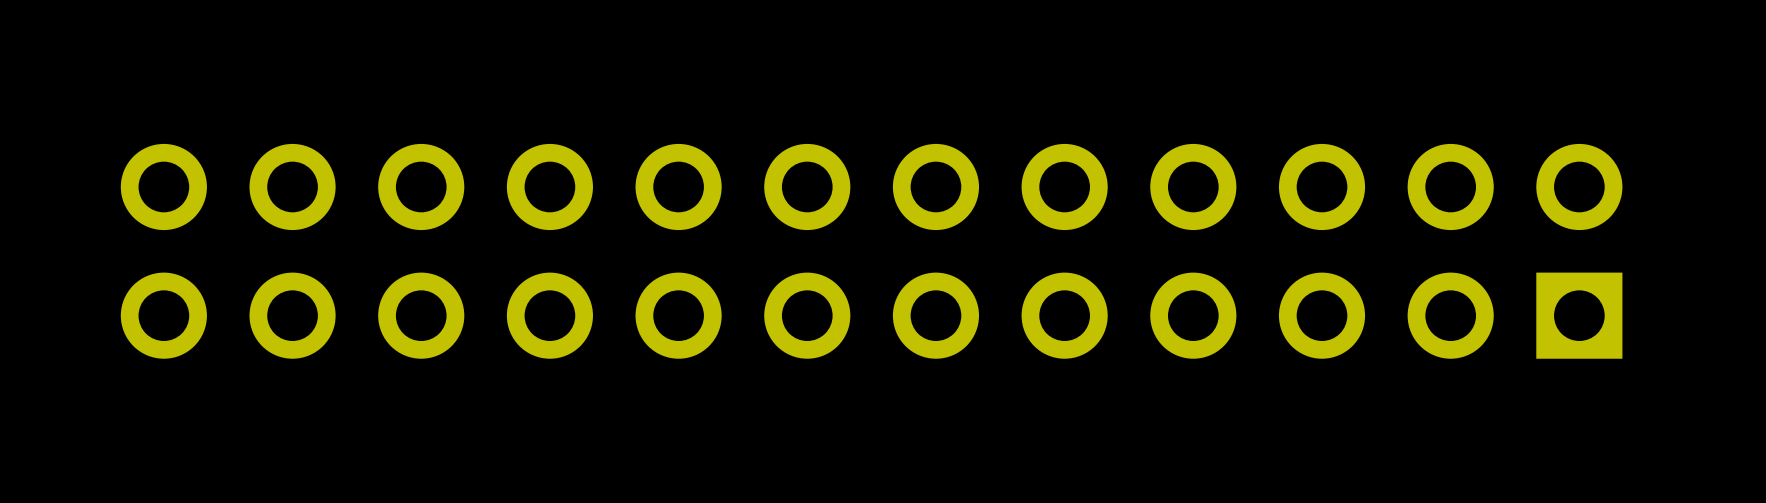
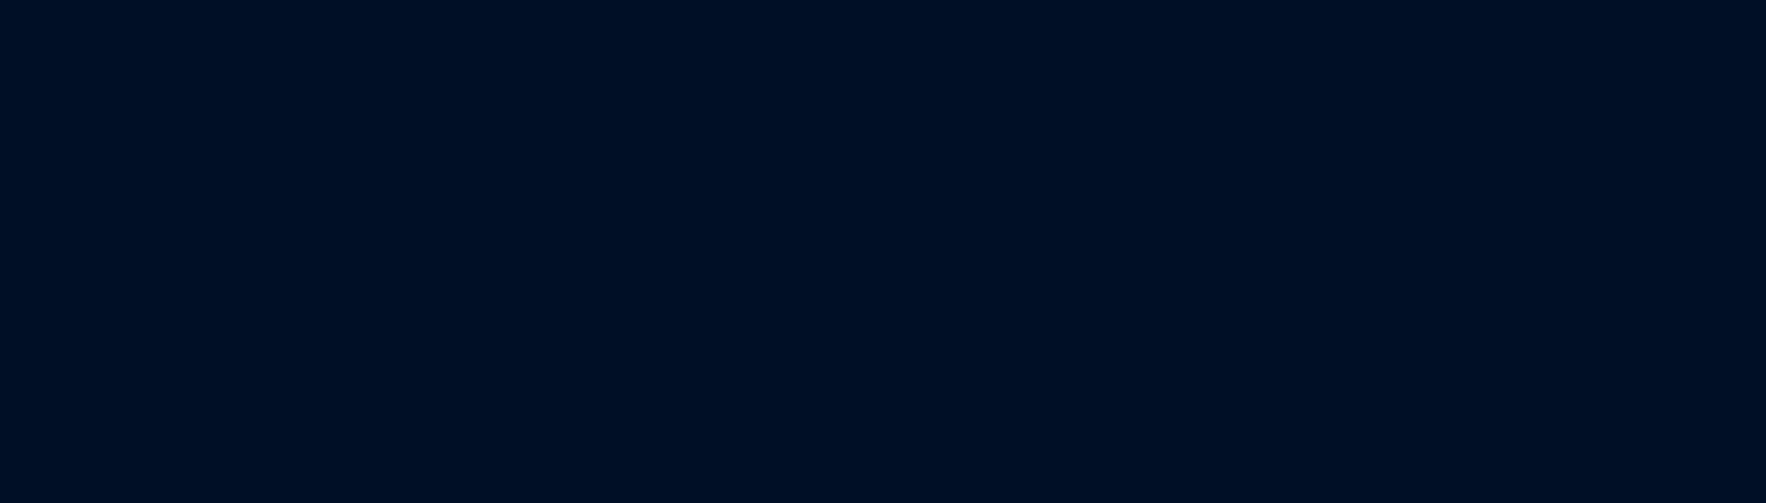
part: (871, 251) -> none

